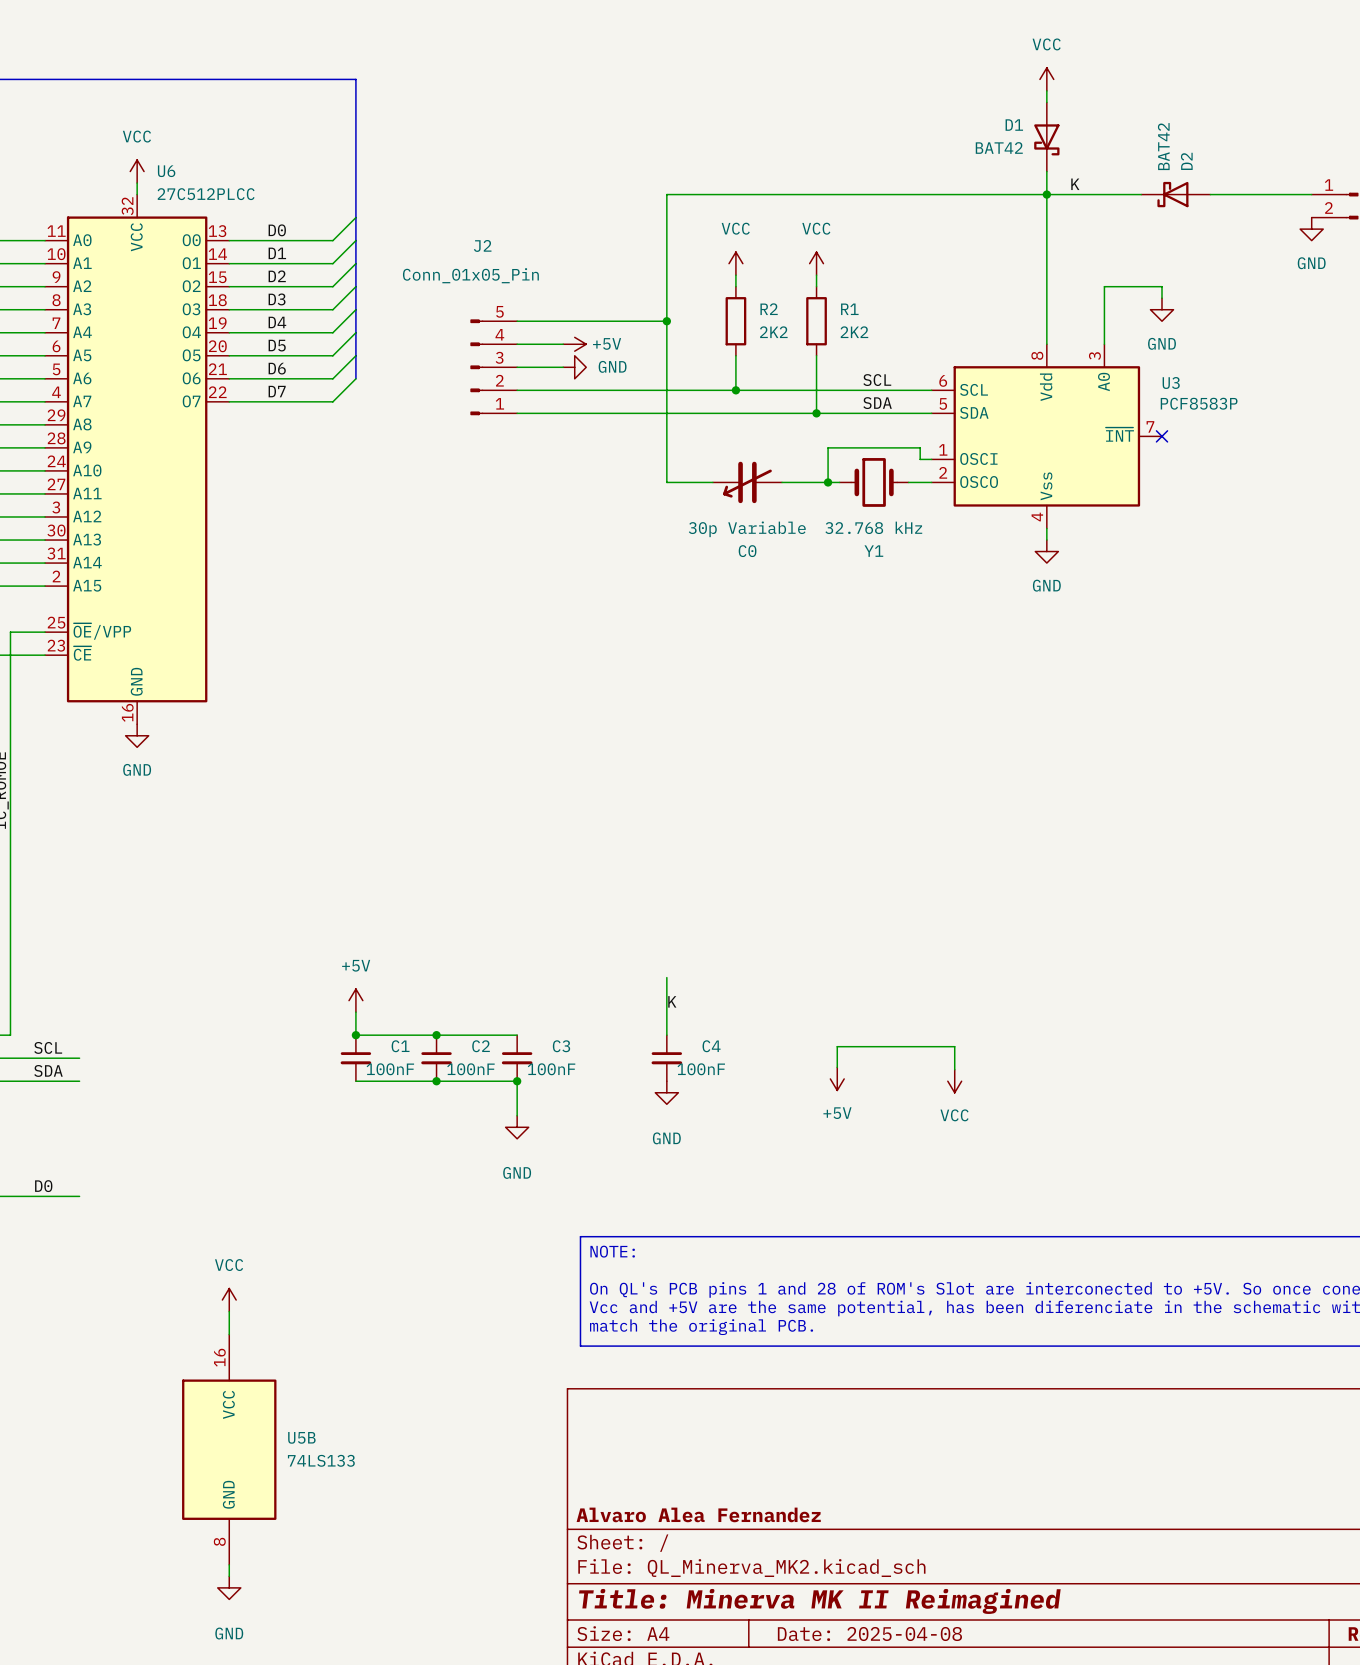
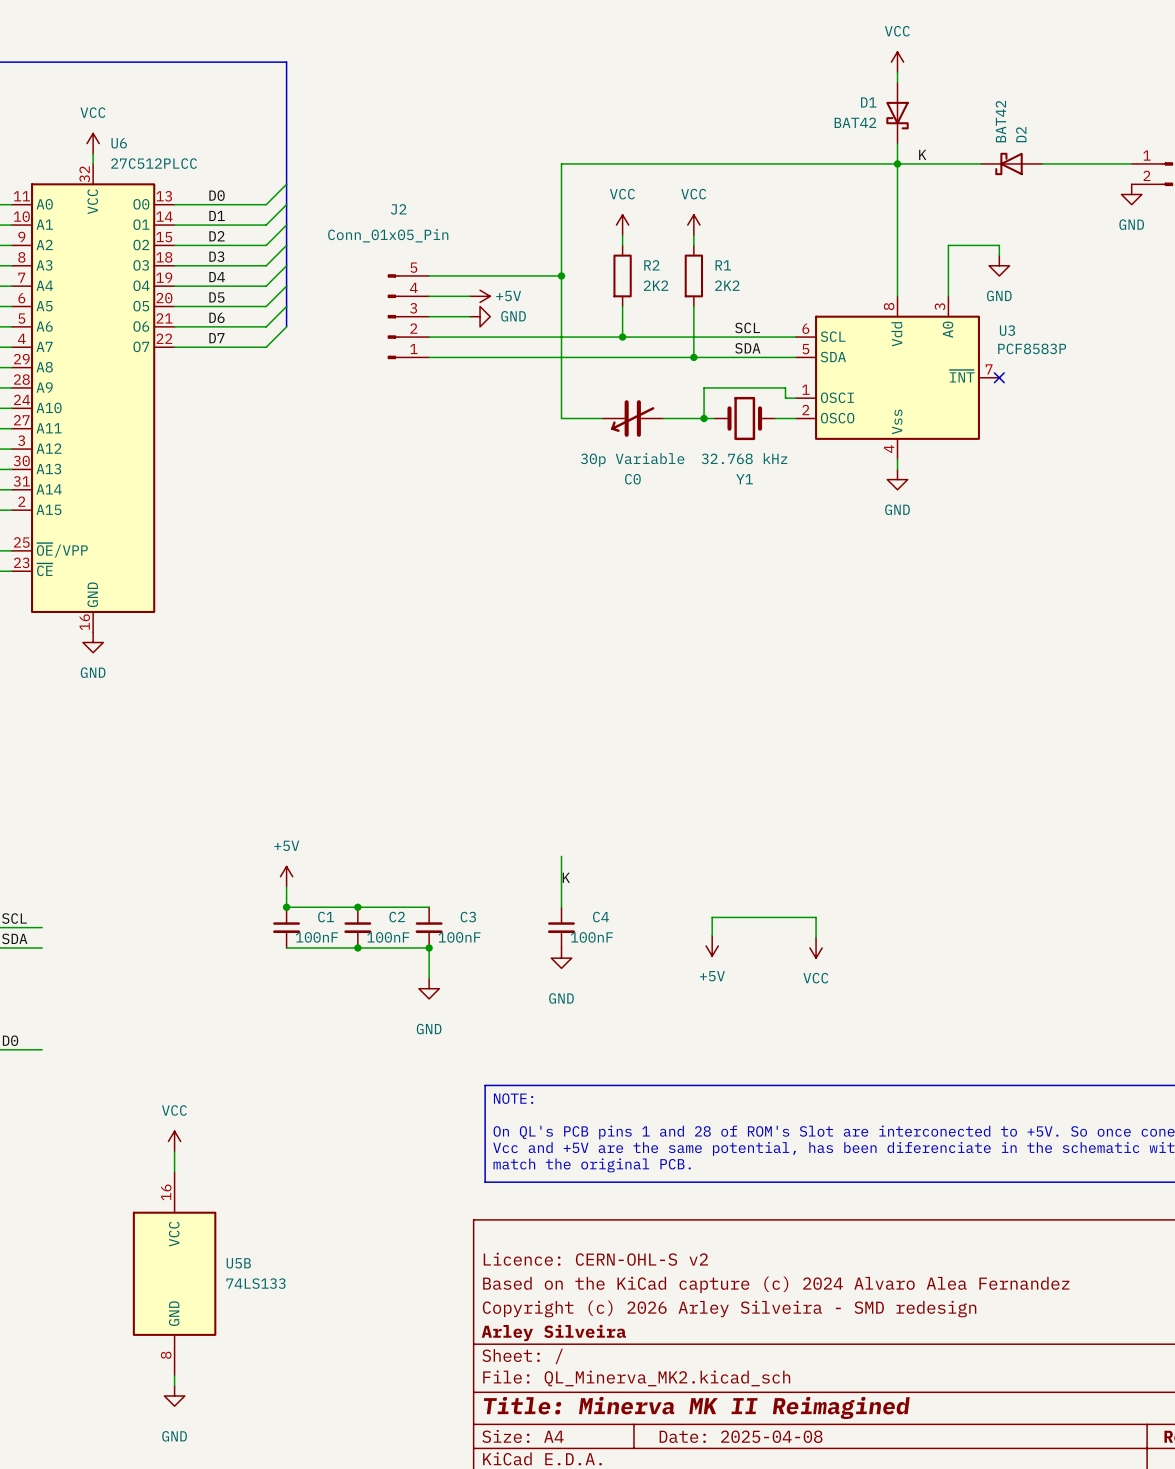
title block: none -> Licence: CERN-OHL-S v2 (595, 1259)
title block: none -> Based on the KiCad capture (c) 2024 Alvaro Alea Fernandez (776, 1284)
title block: none -> Copyright (c) 2026 Arley Silveira - SMD redesign (729, 1308)
title block: Alvaro Alea Fernandez (698, 1514) -> Arley Silveira (553, 1332)

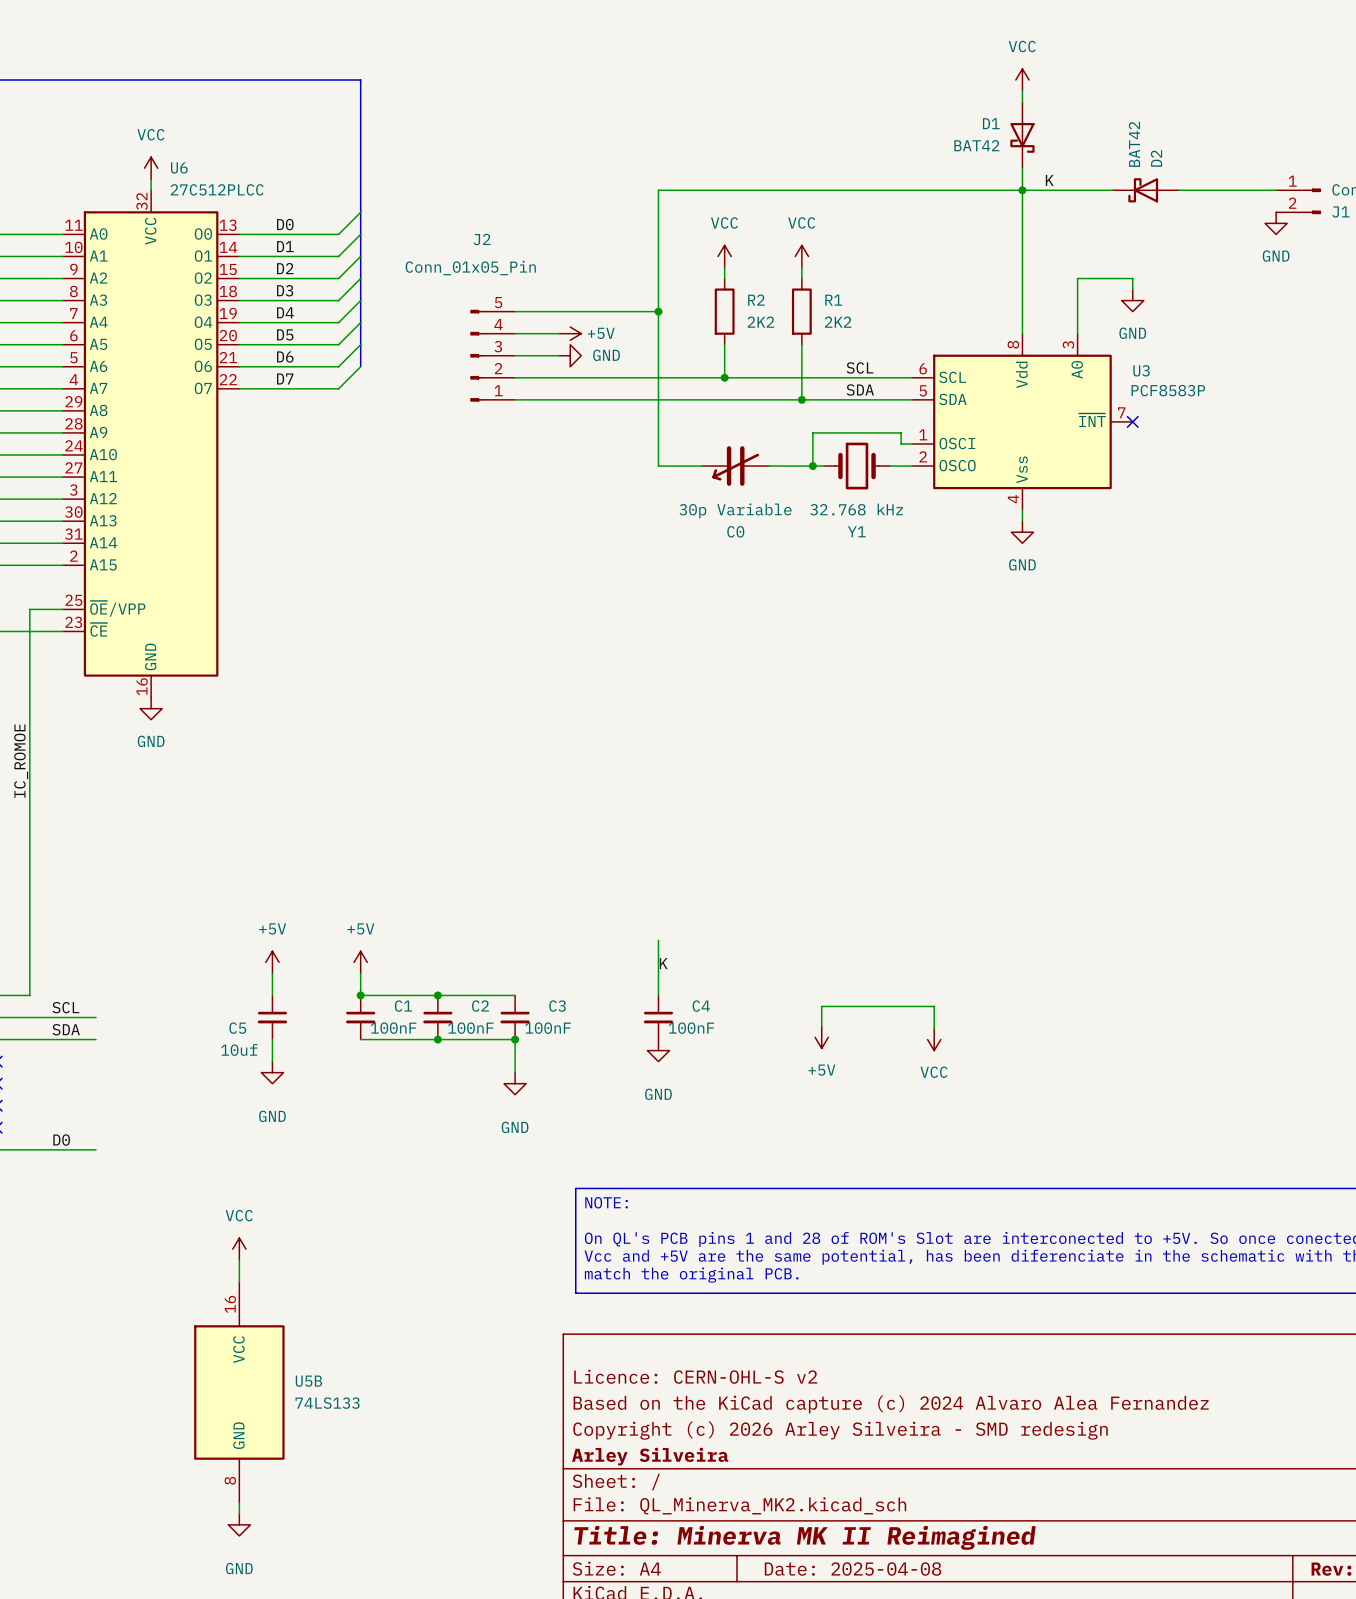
power symbol: none -> +5V (272, 962)
wire: none -> (272, 973) (272, 995)
C5: none -> 10uf (272, 1017)
wire: none -> (272, 1039) (272, 1061)
power symbol: none -> GND (272, 1072)

